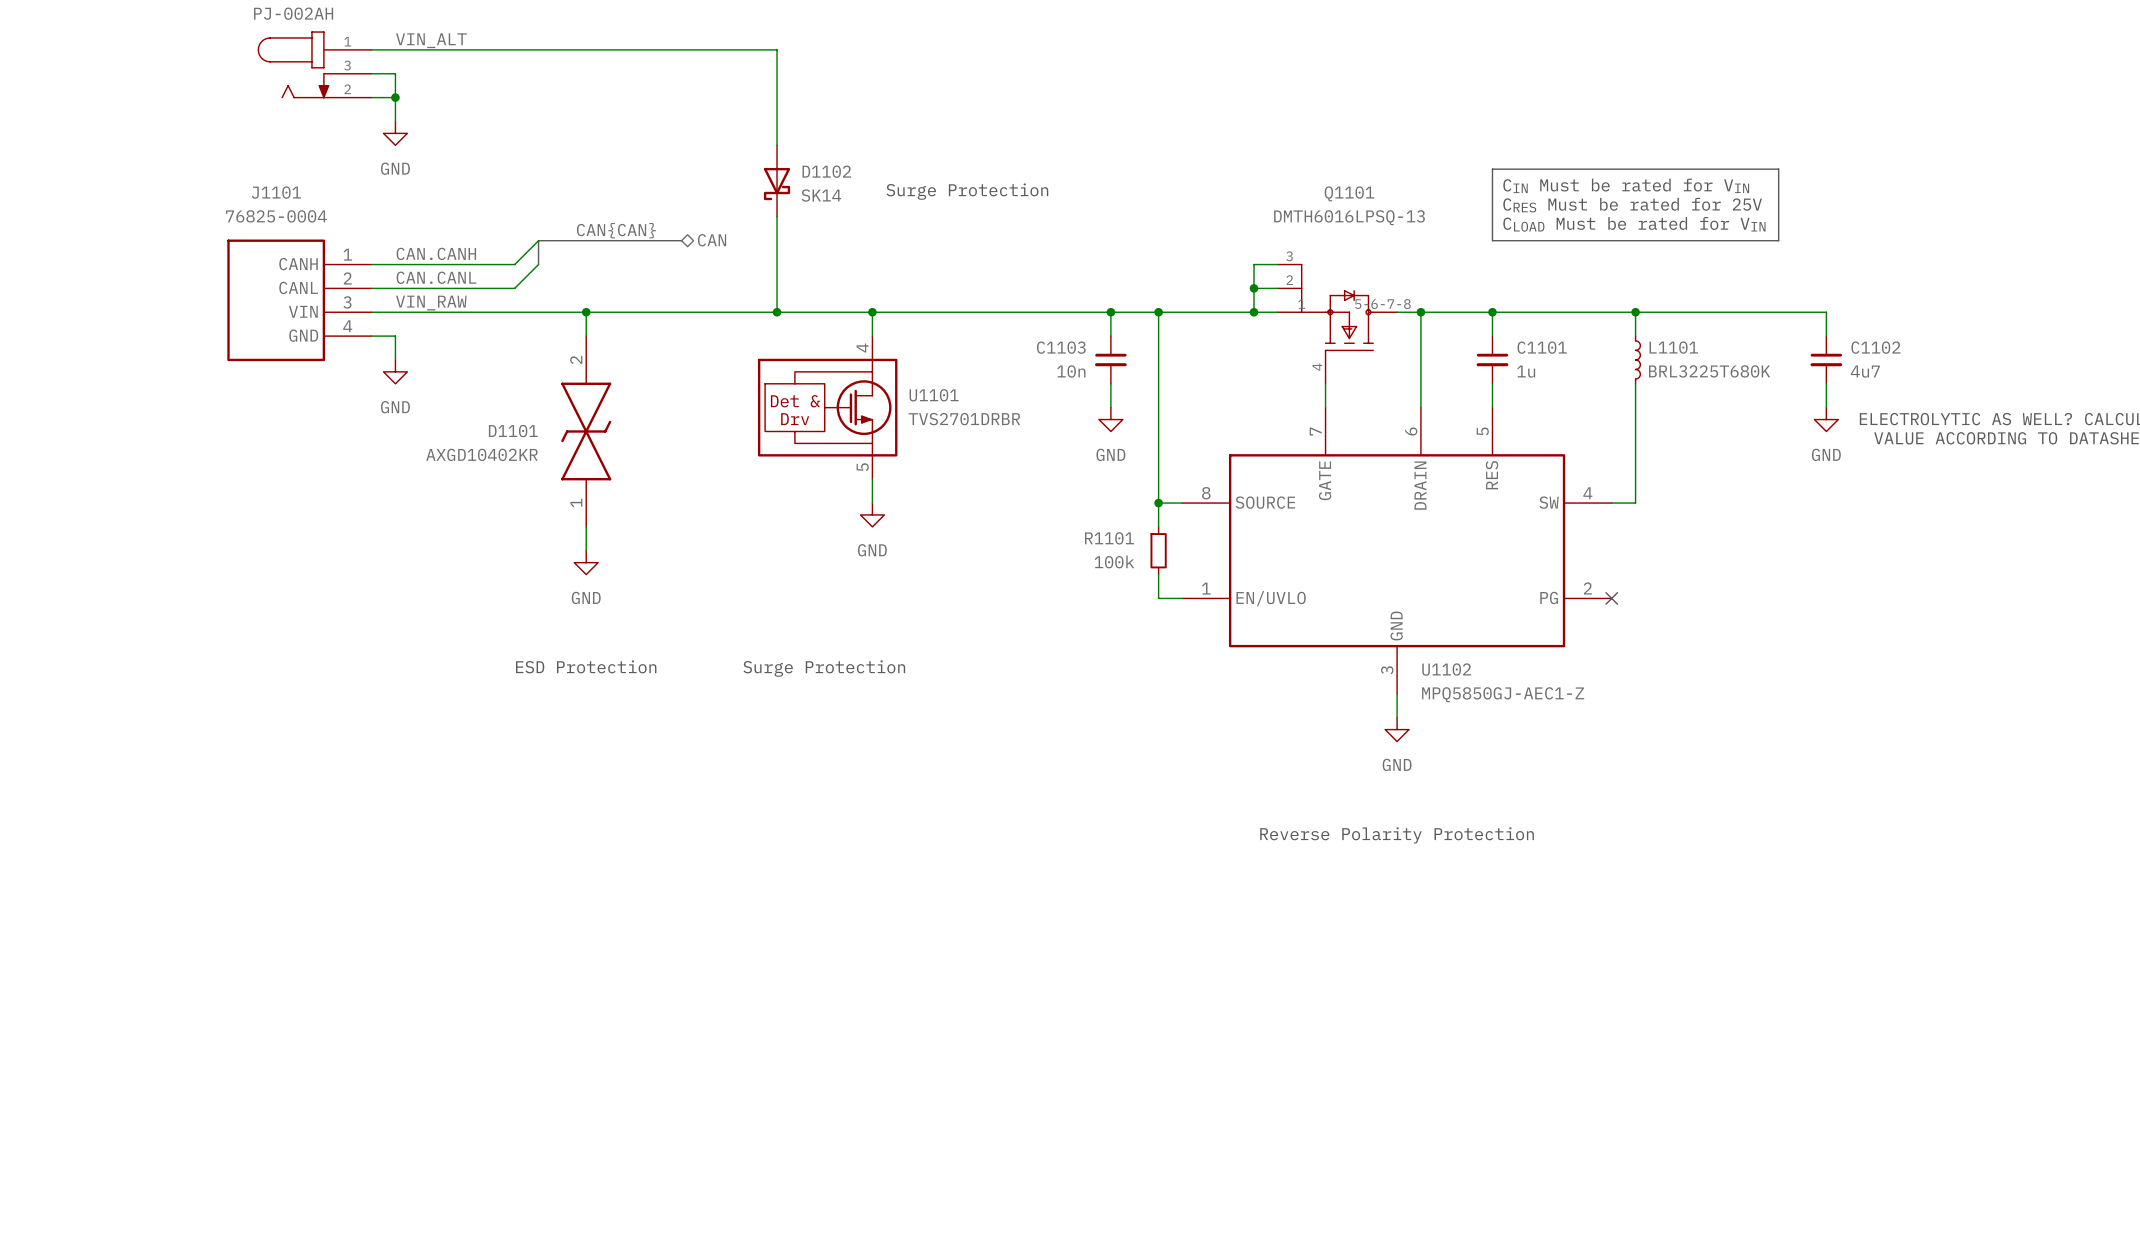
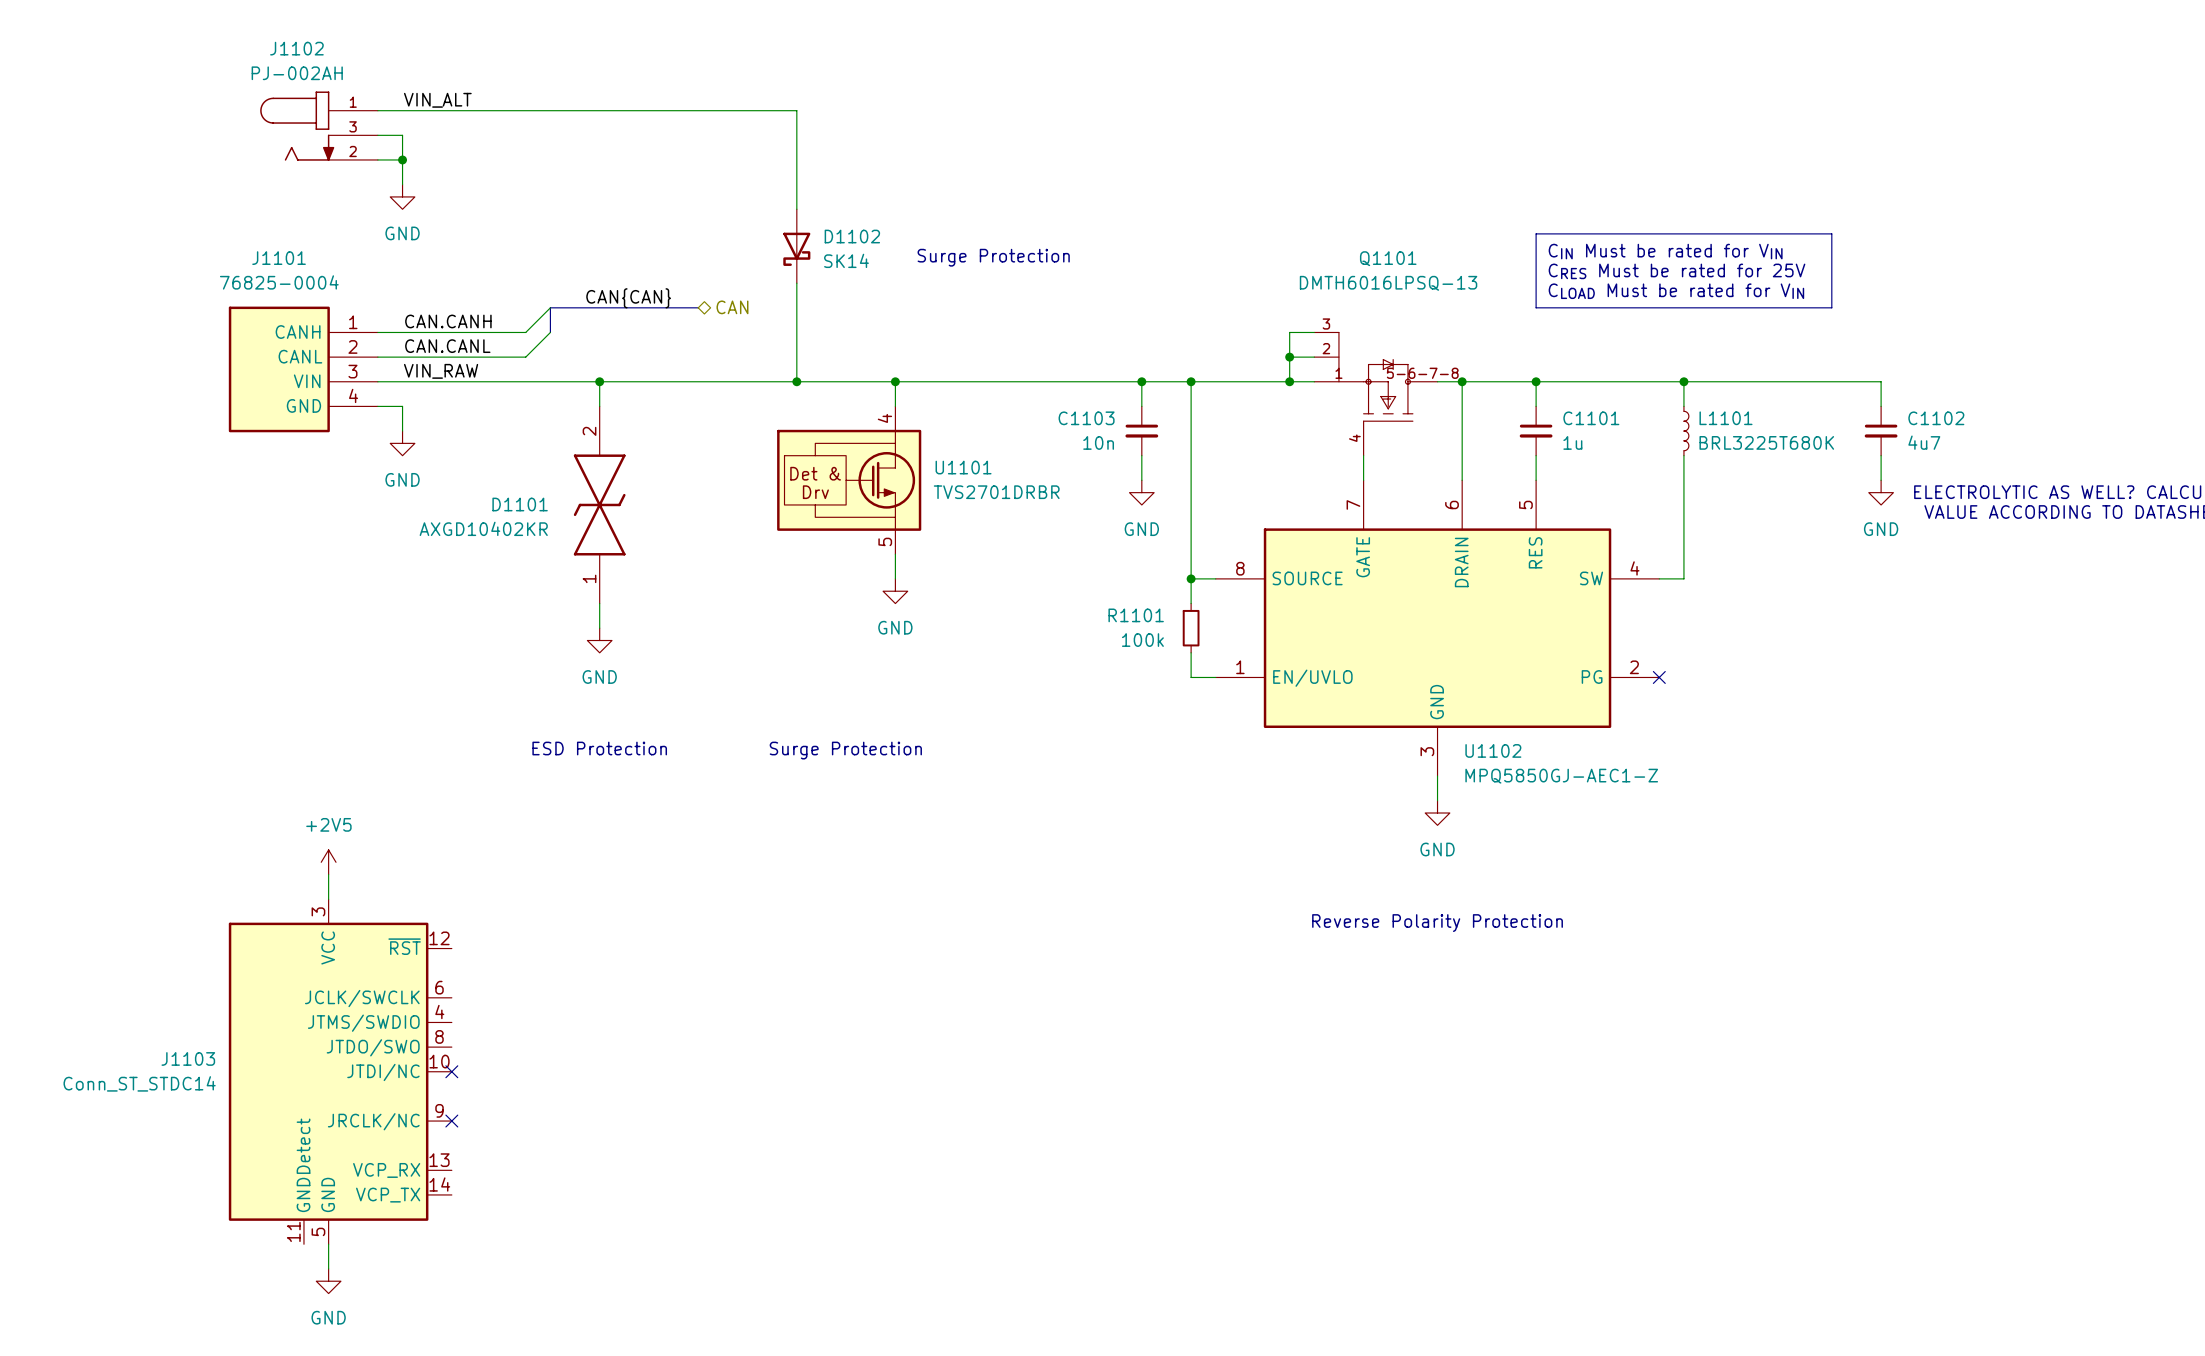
power symbol: none -> +2V5 (328, 862)
wire: none -> (328, 874) (328, 899)
J1103: none -> Conn_ST_STDC14 (340, 1071)
no-connect mark: none -> (451, 1071)
no-connect mark: none -> (451, 1121)
wire: none -> (328, 1244) (328, 1268)
power symbol: none -> GND (328, 1281)

